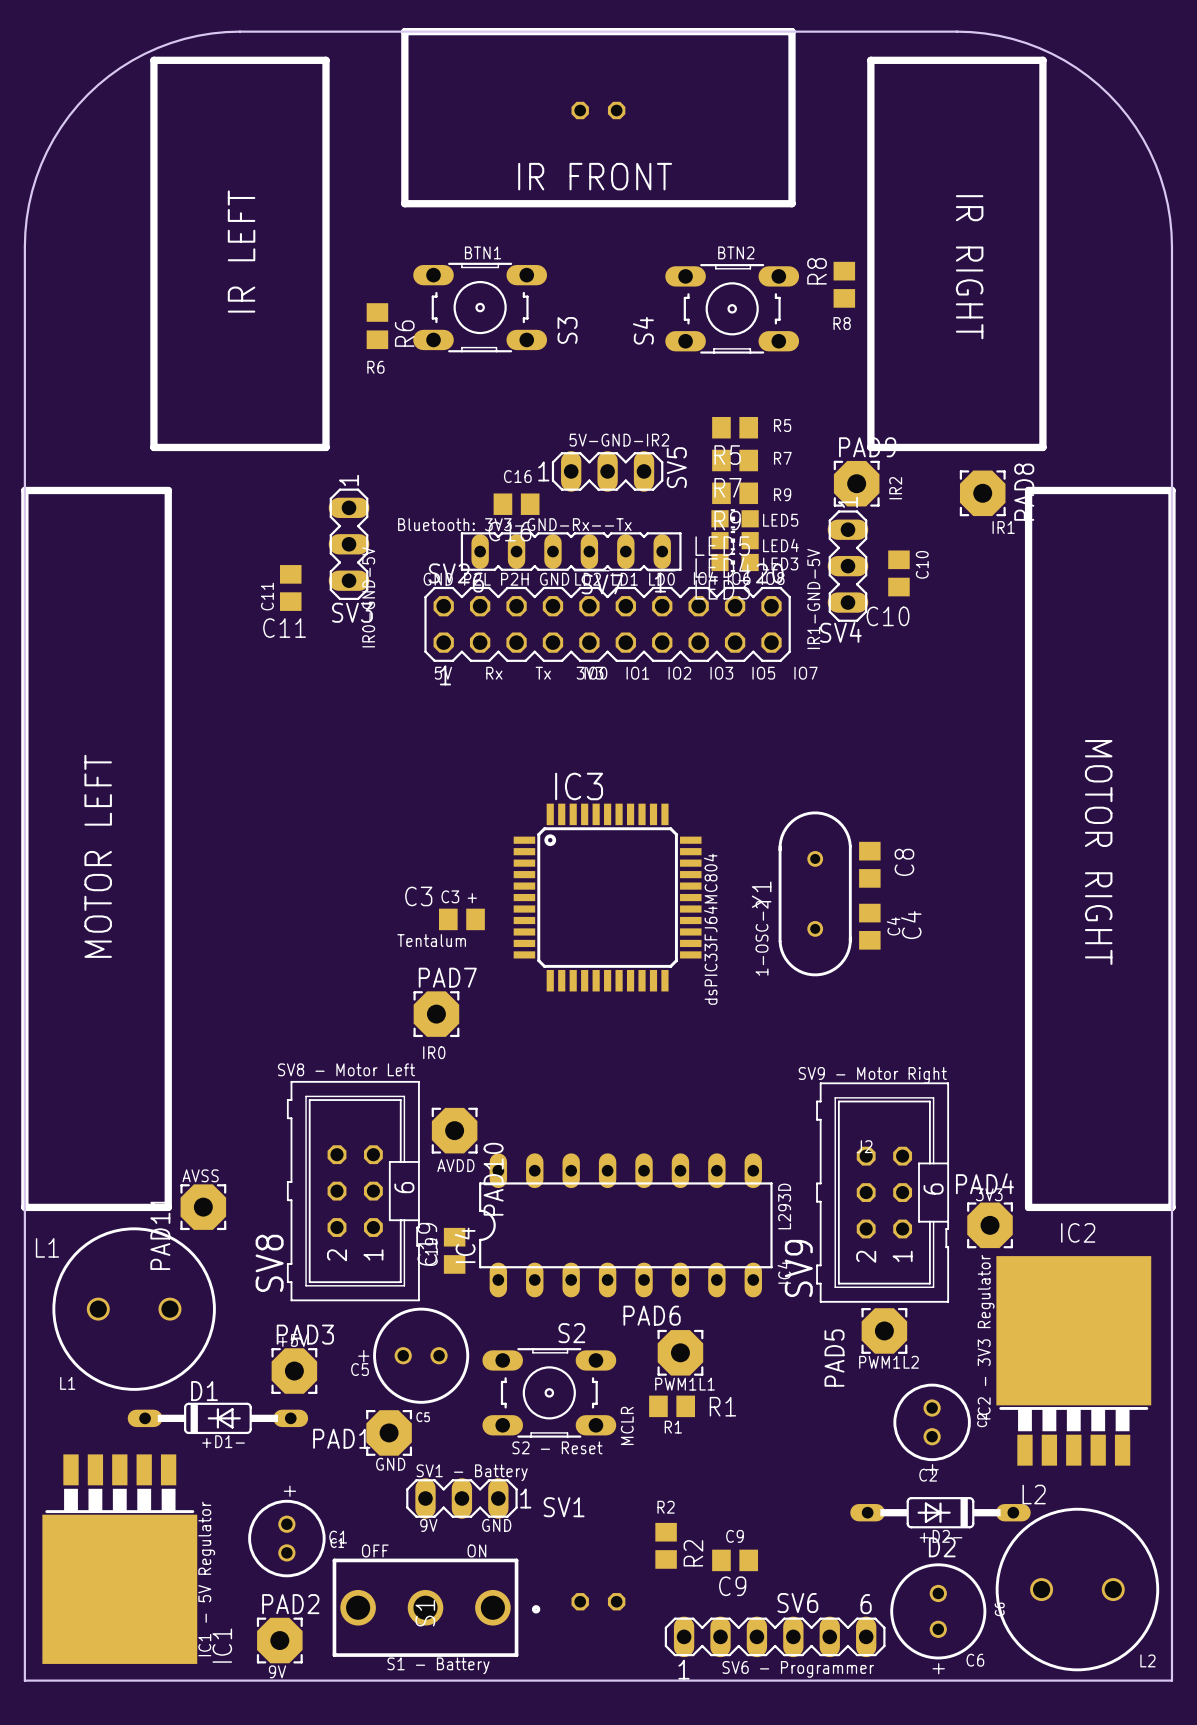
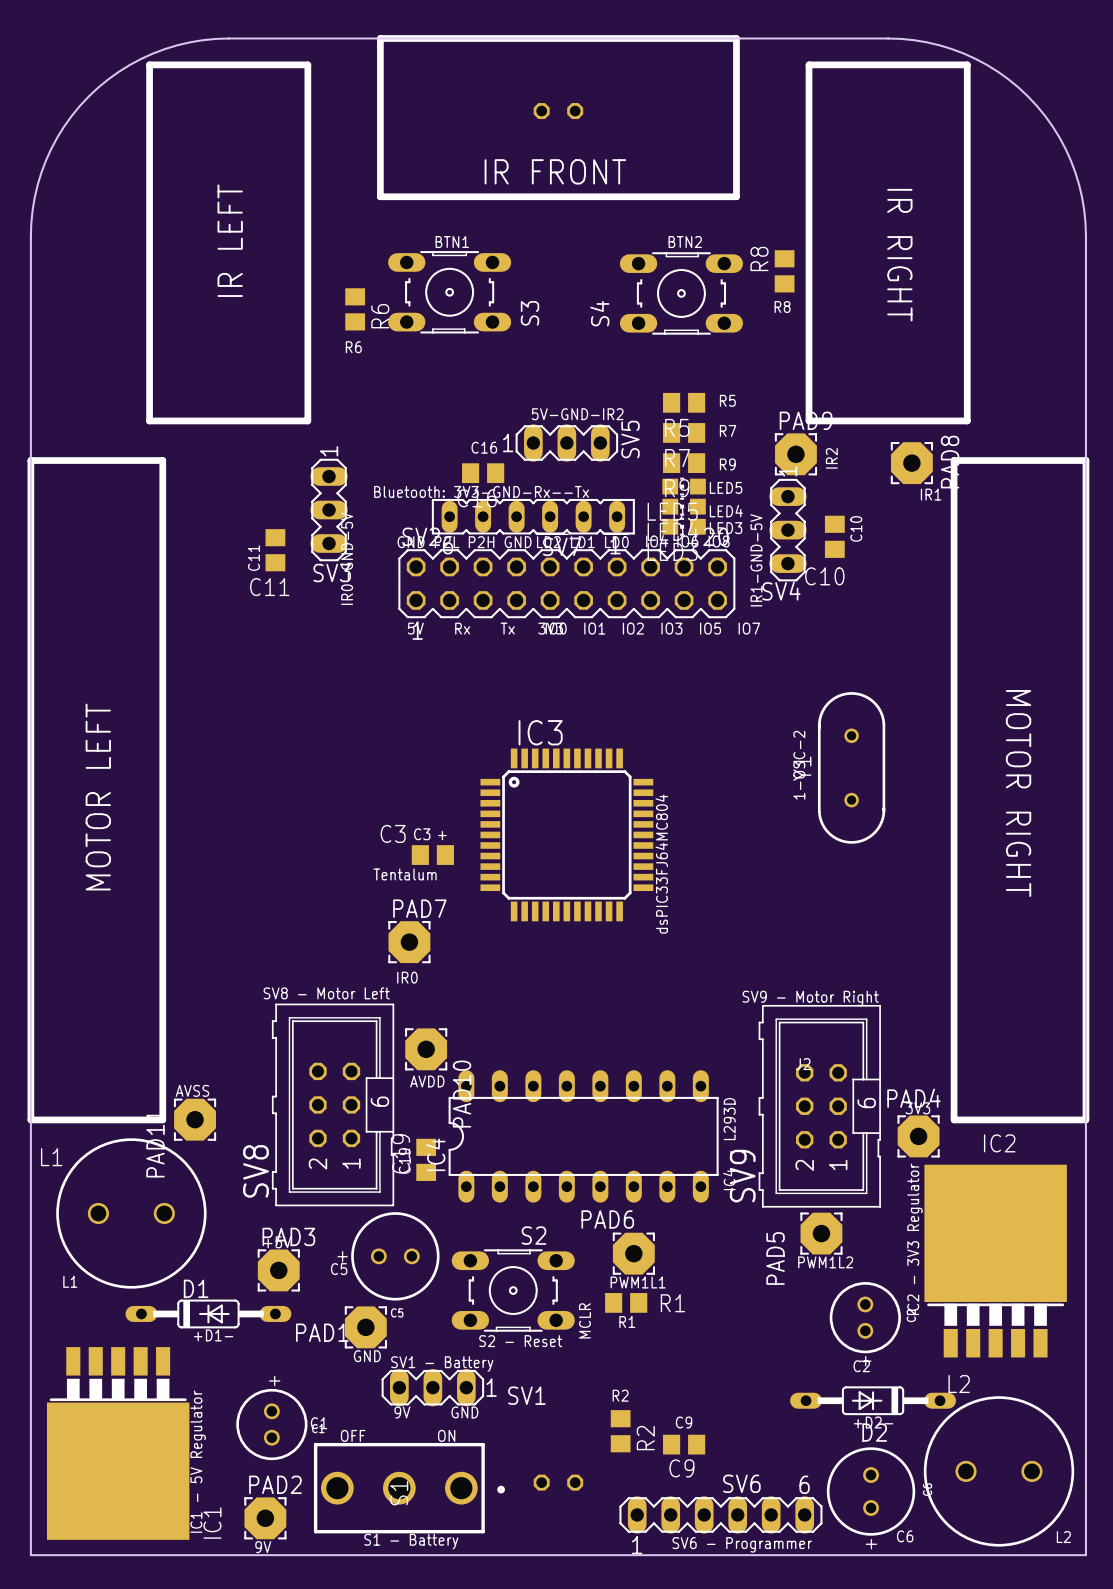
C8: (869, 864) -> none
Y1 position: (815, 893) -> (851, 767)
C4: (869, 926) -> none
text: C4 (893, 926) -> none
text position: 1-OSC-2 (762, 938) -> 1-OSC-2 (799, 765)

